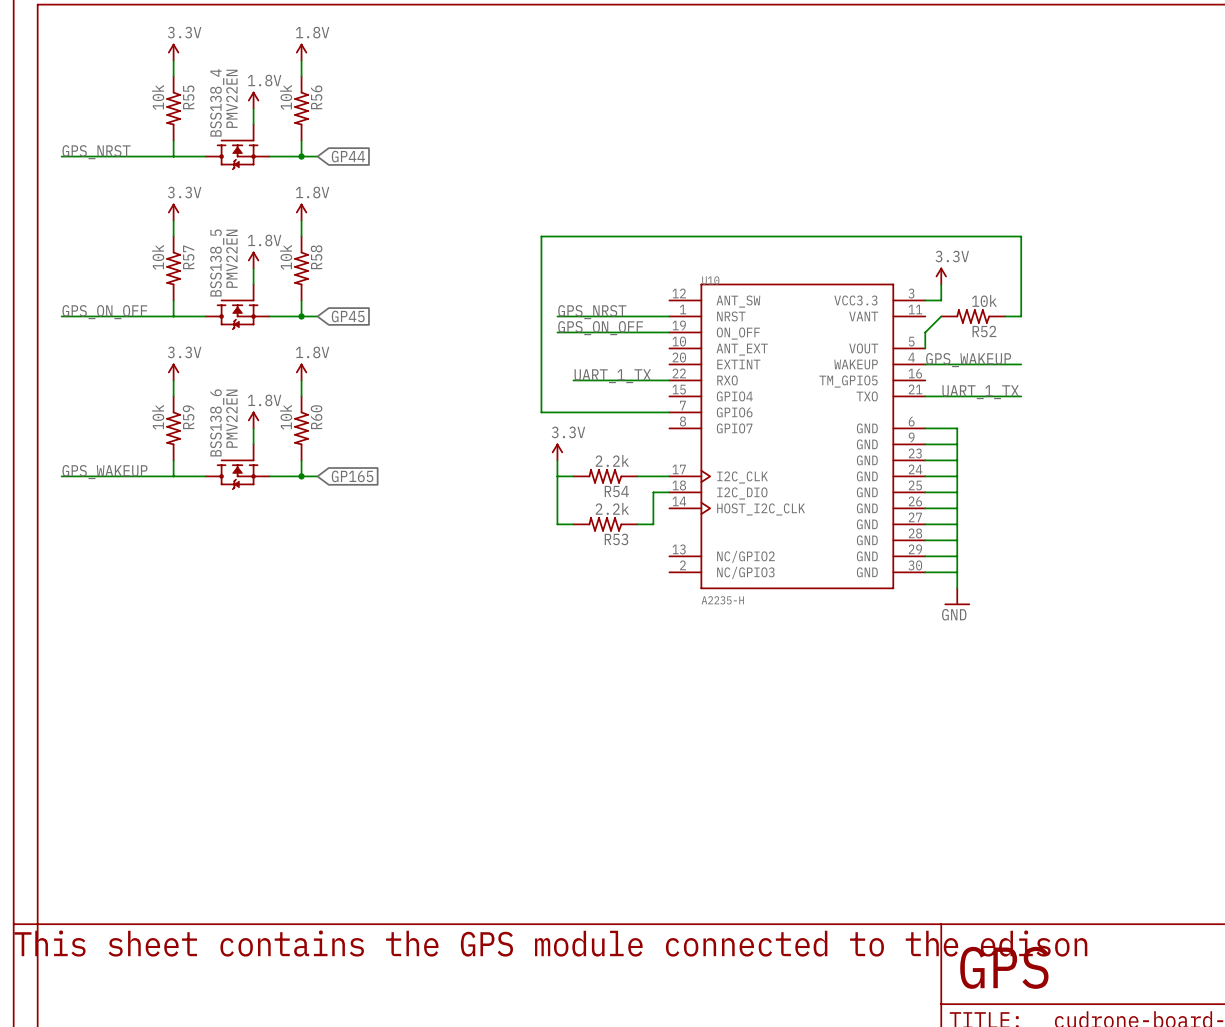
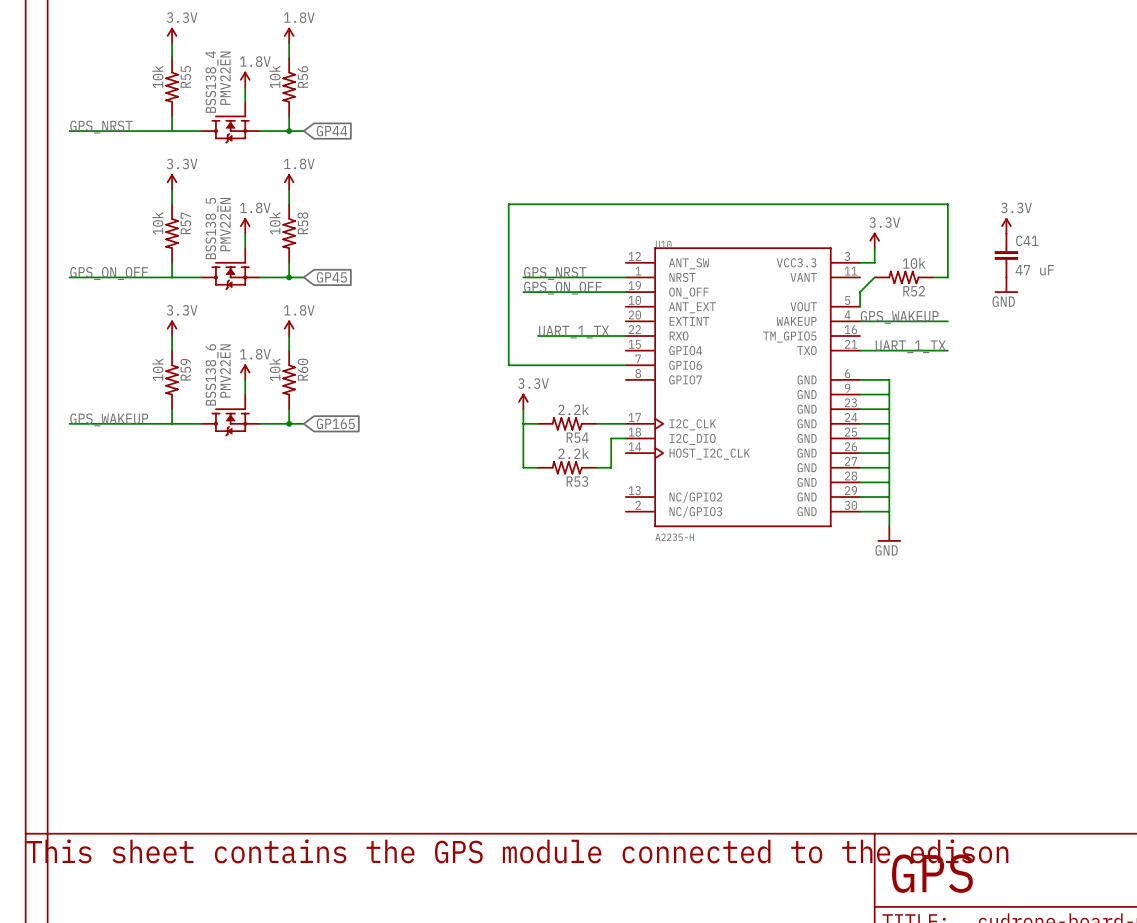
power symbol: none -> 3.3V (1006, 225)
C41: none -> 47 uF (1006, 255)
power symbol: none -> GND (1006, 285)

